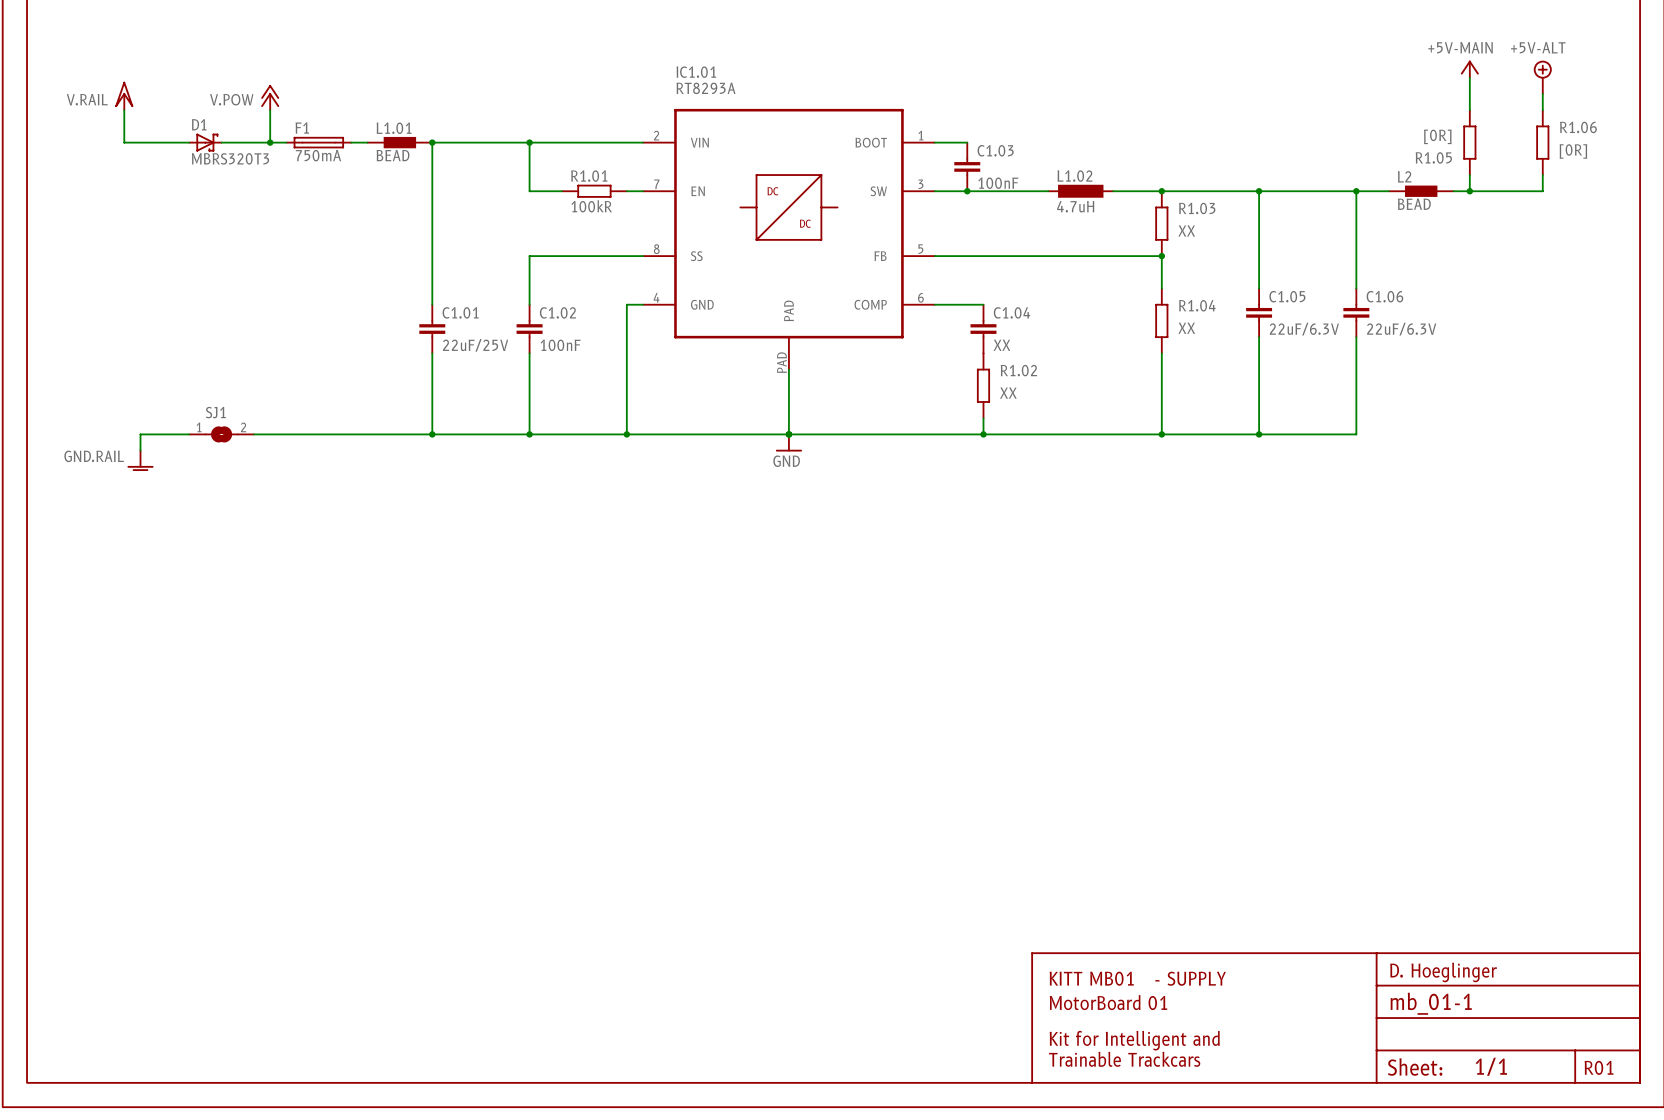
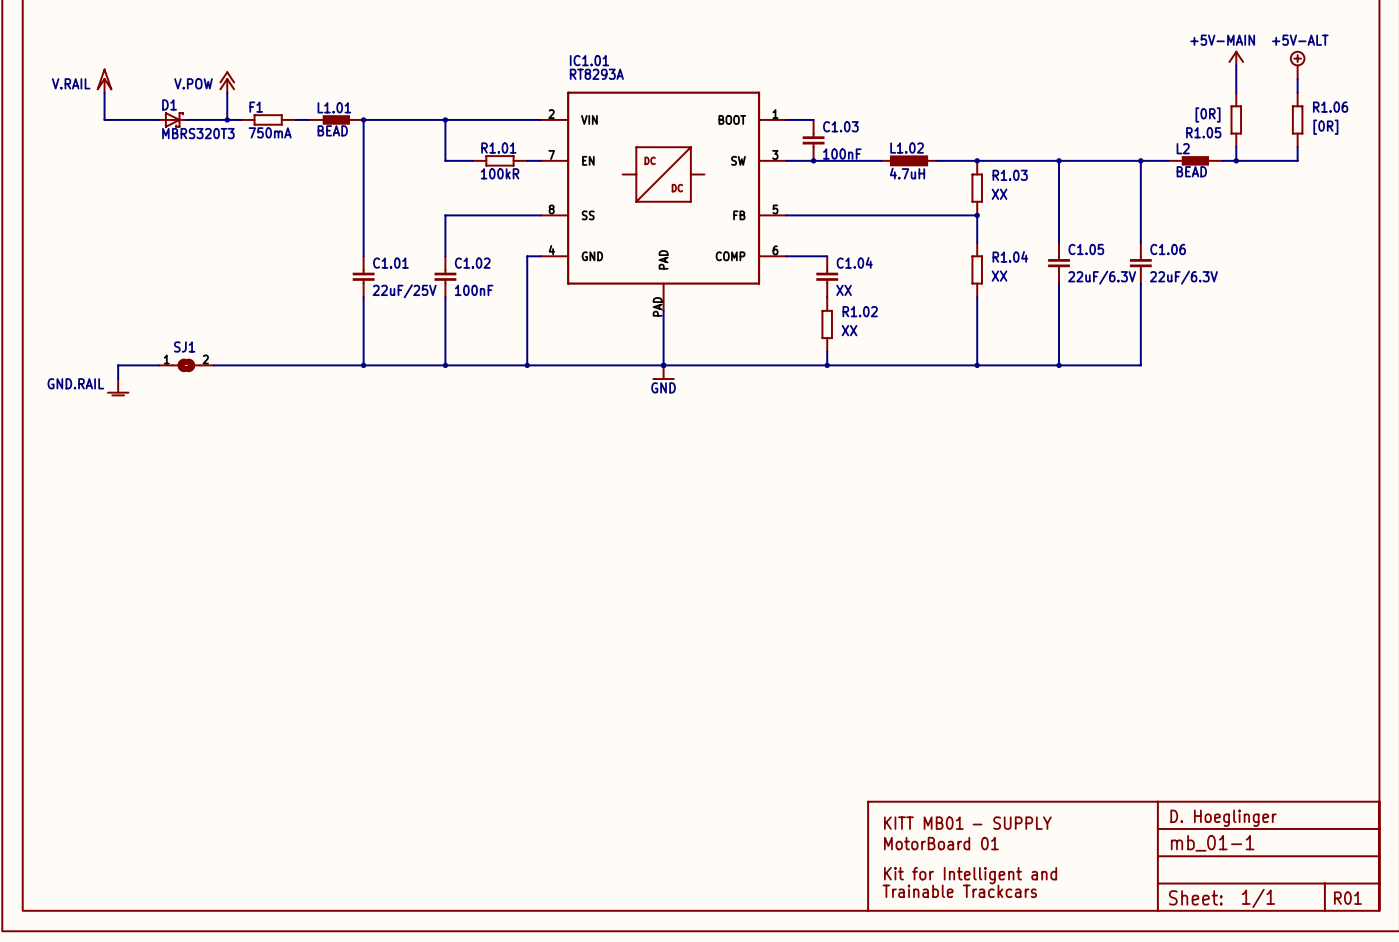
F1 symbol: [286, 136, 352, 149] -> [240, 114, 296, 126]

